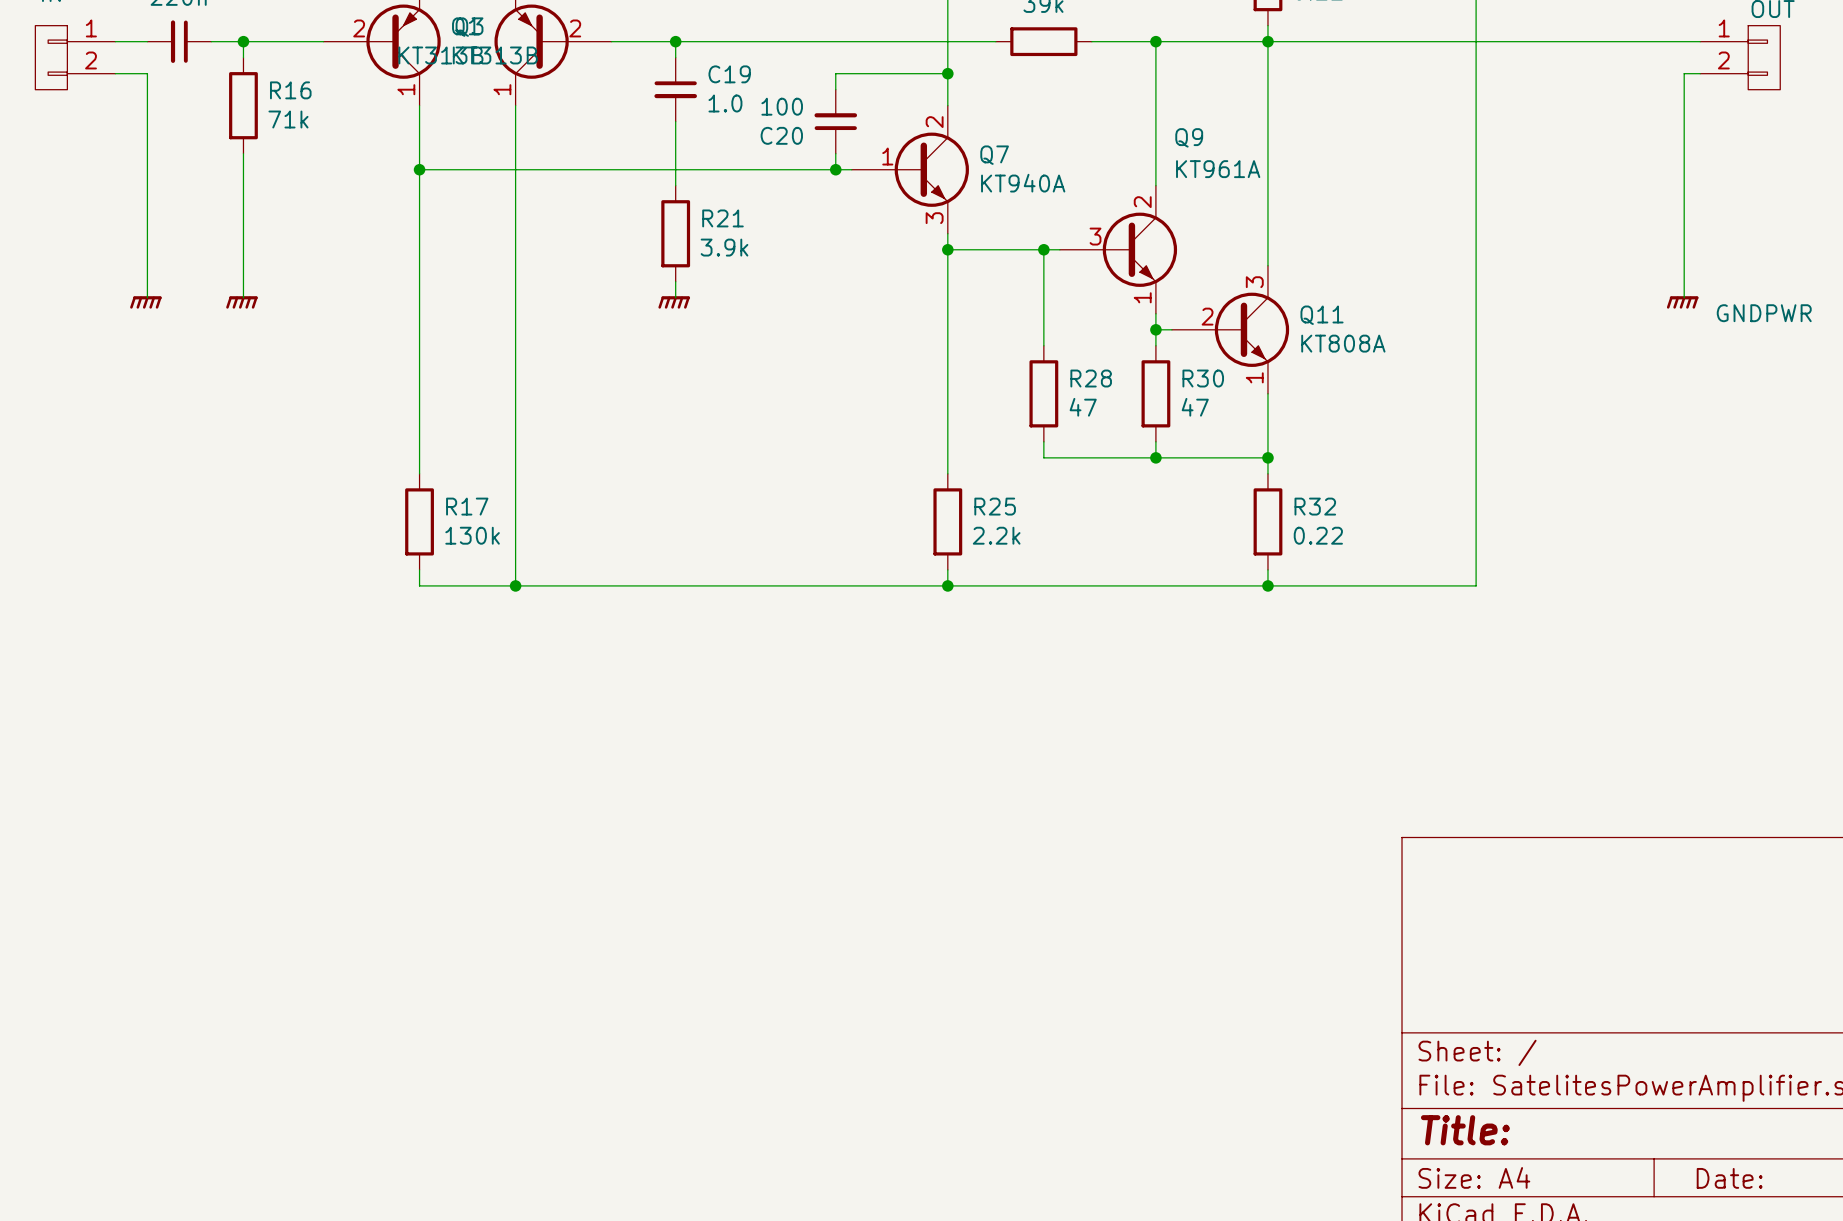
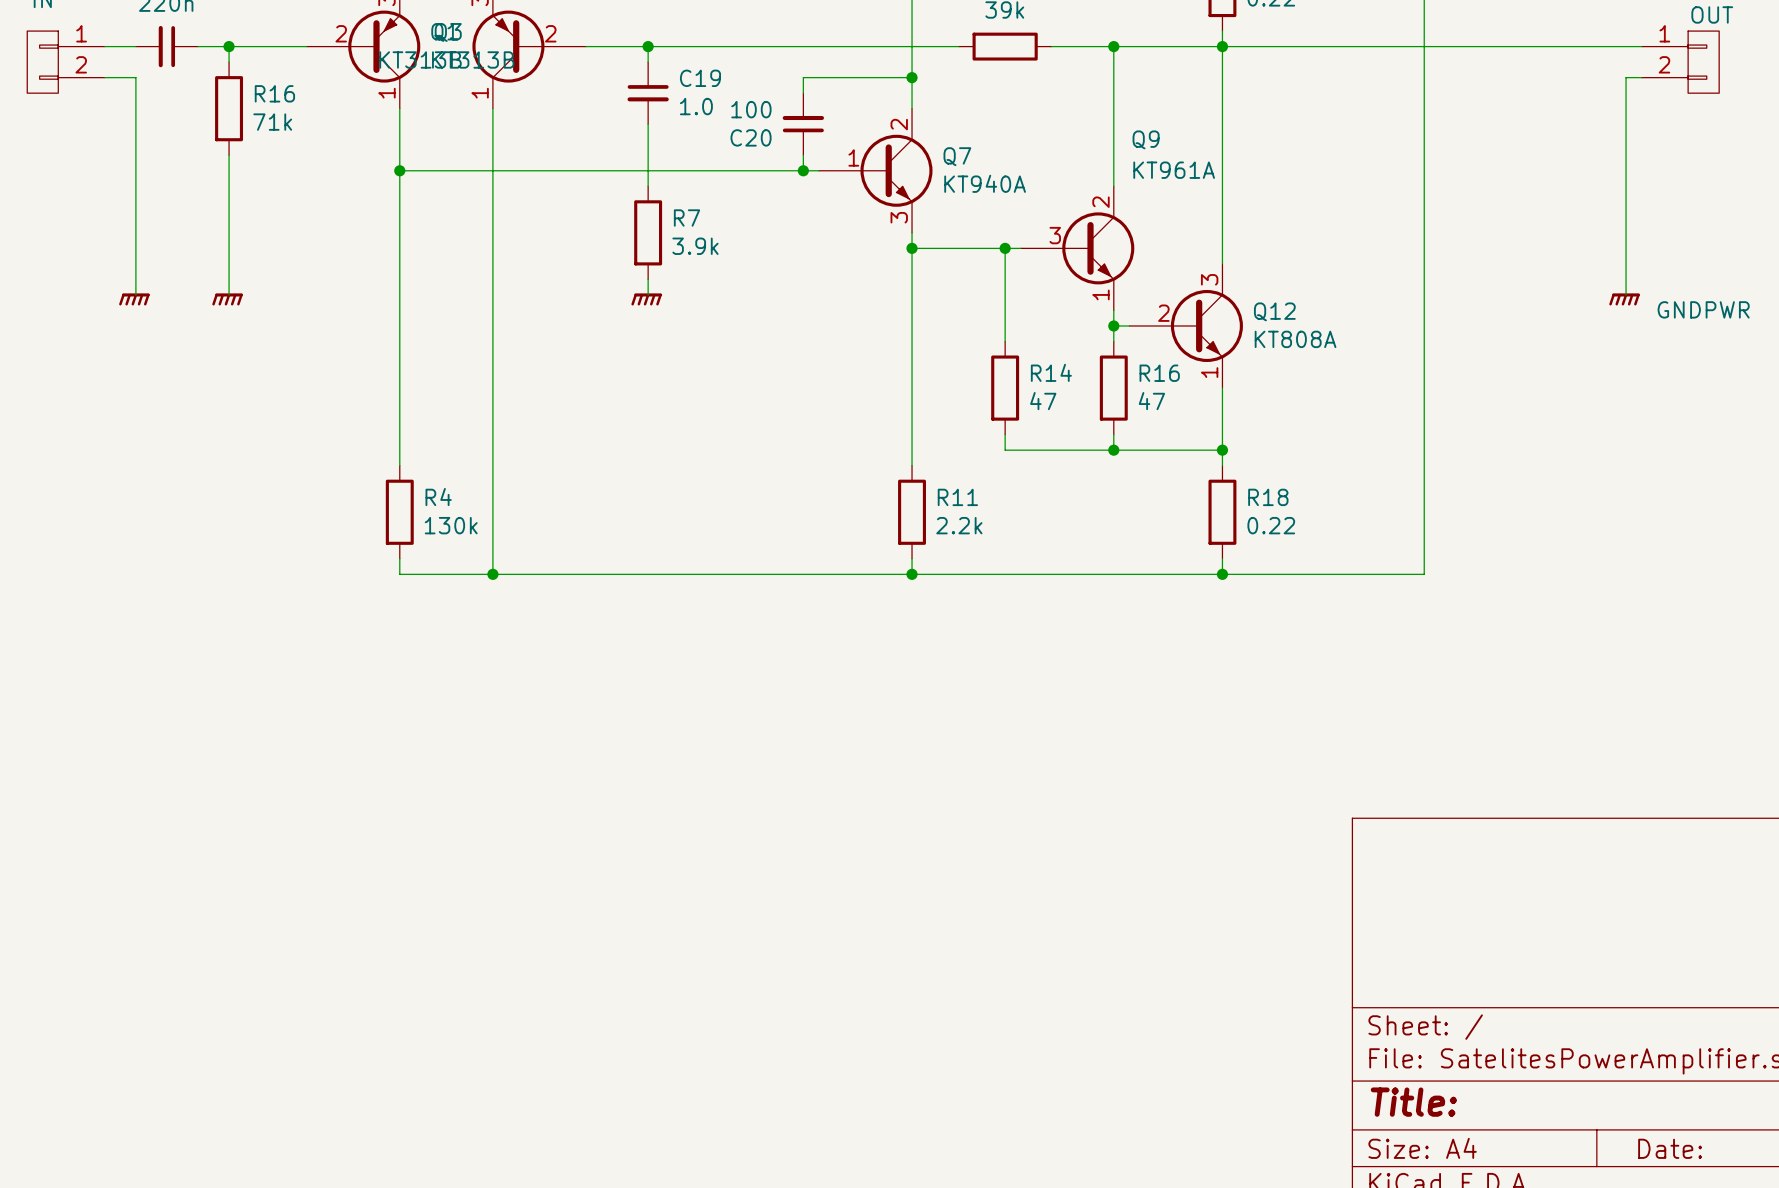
R21 name: R21 (722, 218) -> R7 (686, 218)
Q11 name: Q11 (1322, 315) -> Q12 (1274, 311)
R28 name: R28 (1091, 378) -> R14 (1051, 372)
R30 name: R30 (1203, 378) -> R16 (1159, 373)
R17 name: R17 (467, 506) -> R4 (438, 497)
R25 name: R25 (995, 506) -> R11 (957, 497)
R32 name: R32 (1315, 506) -> R18 (1268, 497)

